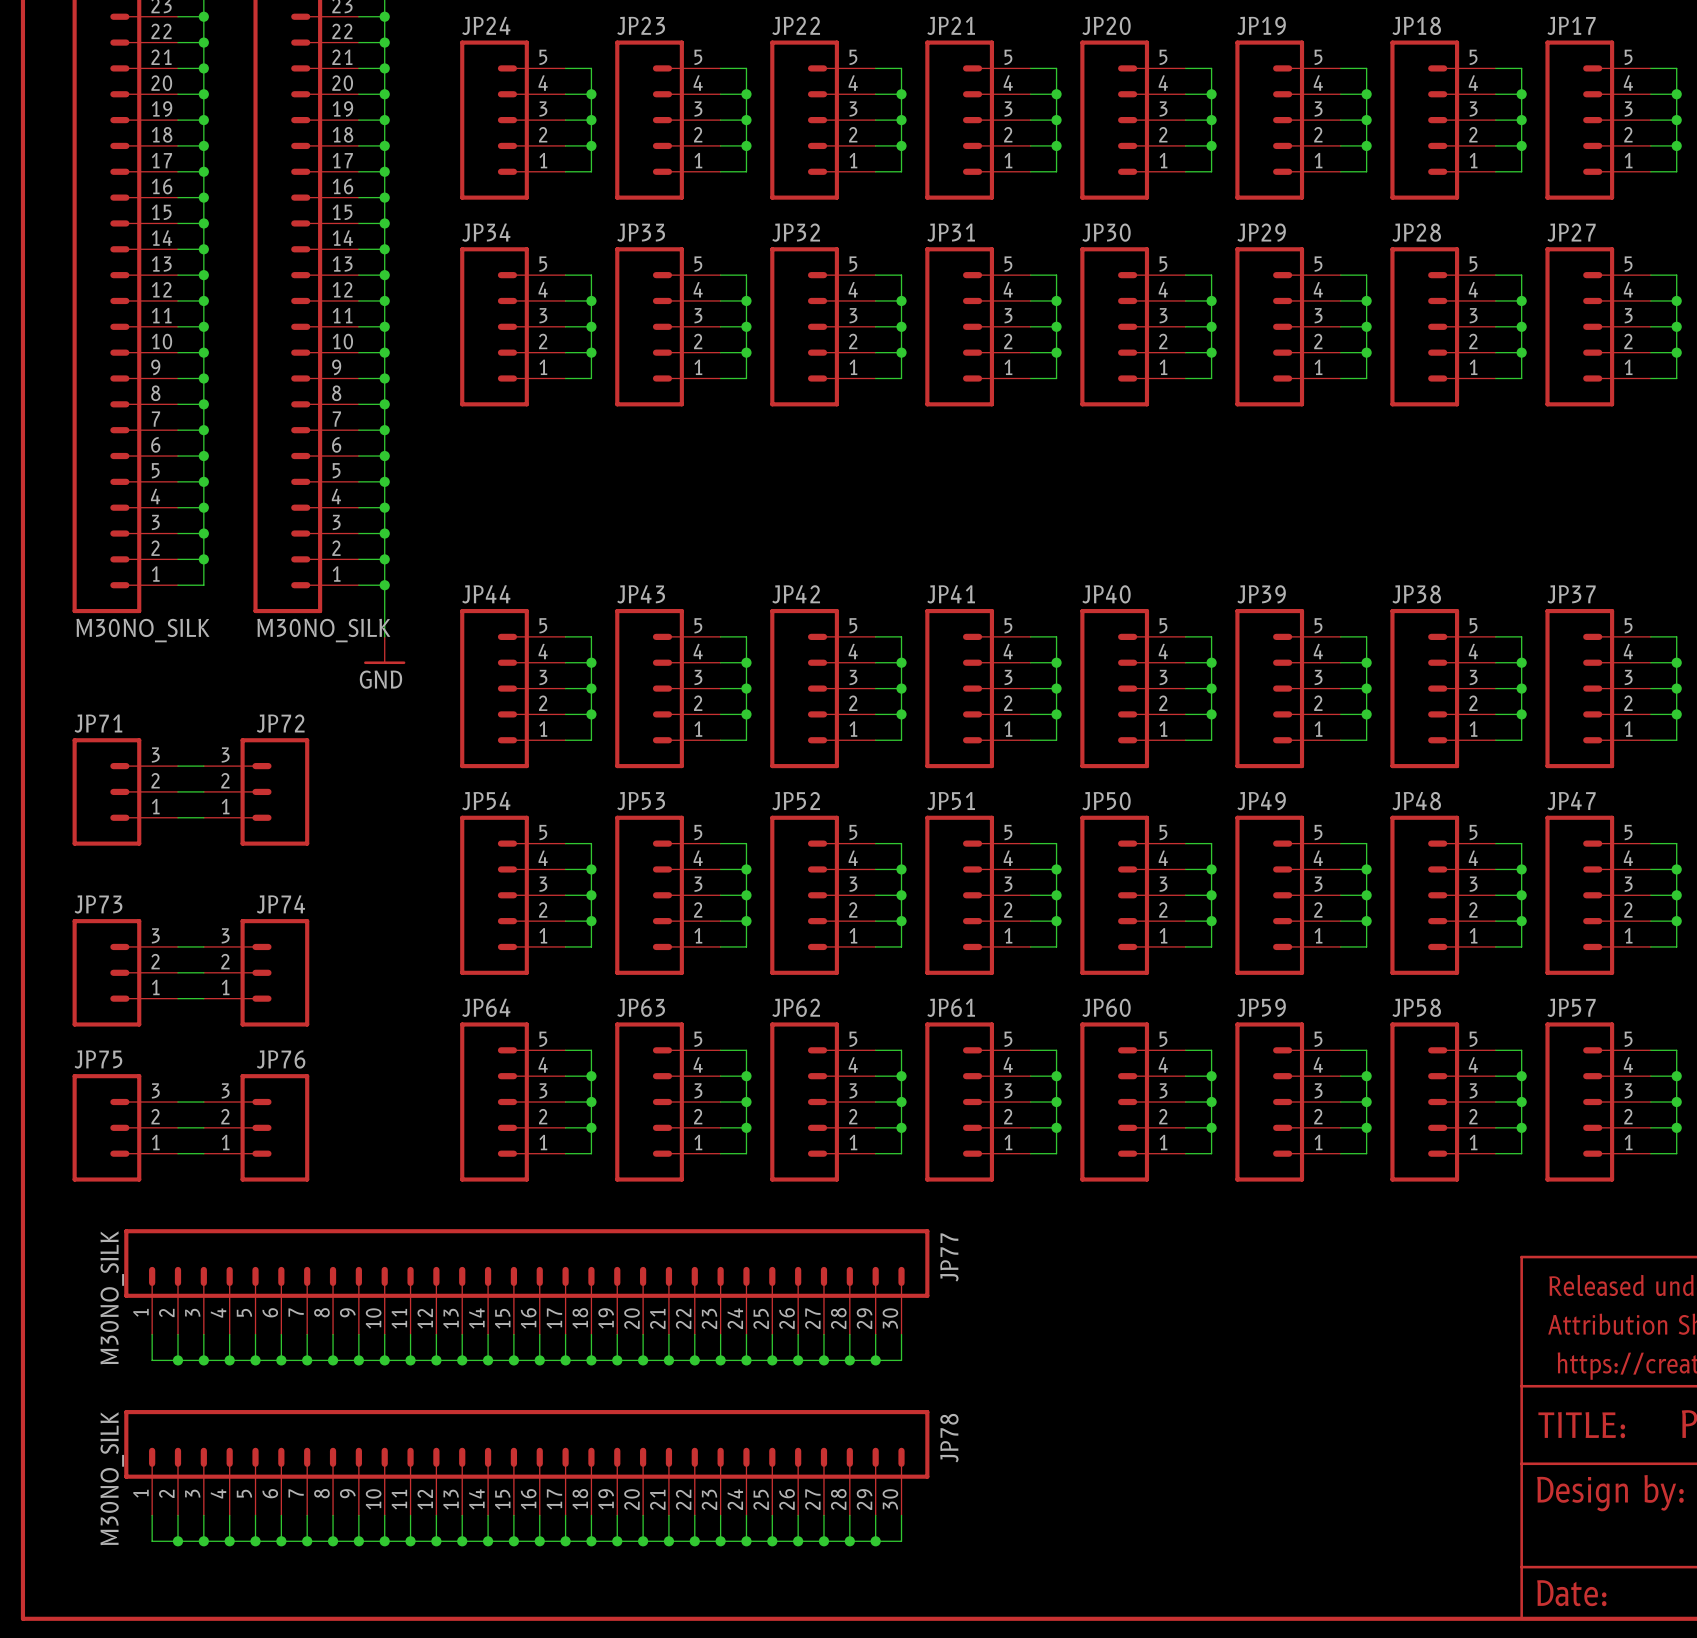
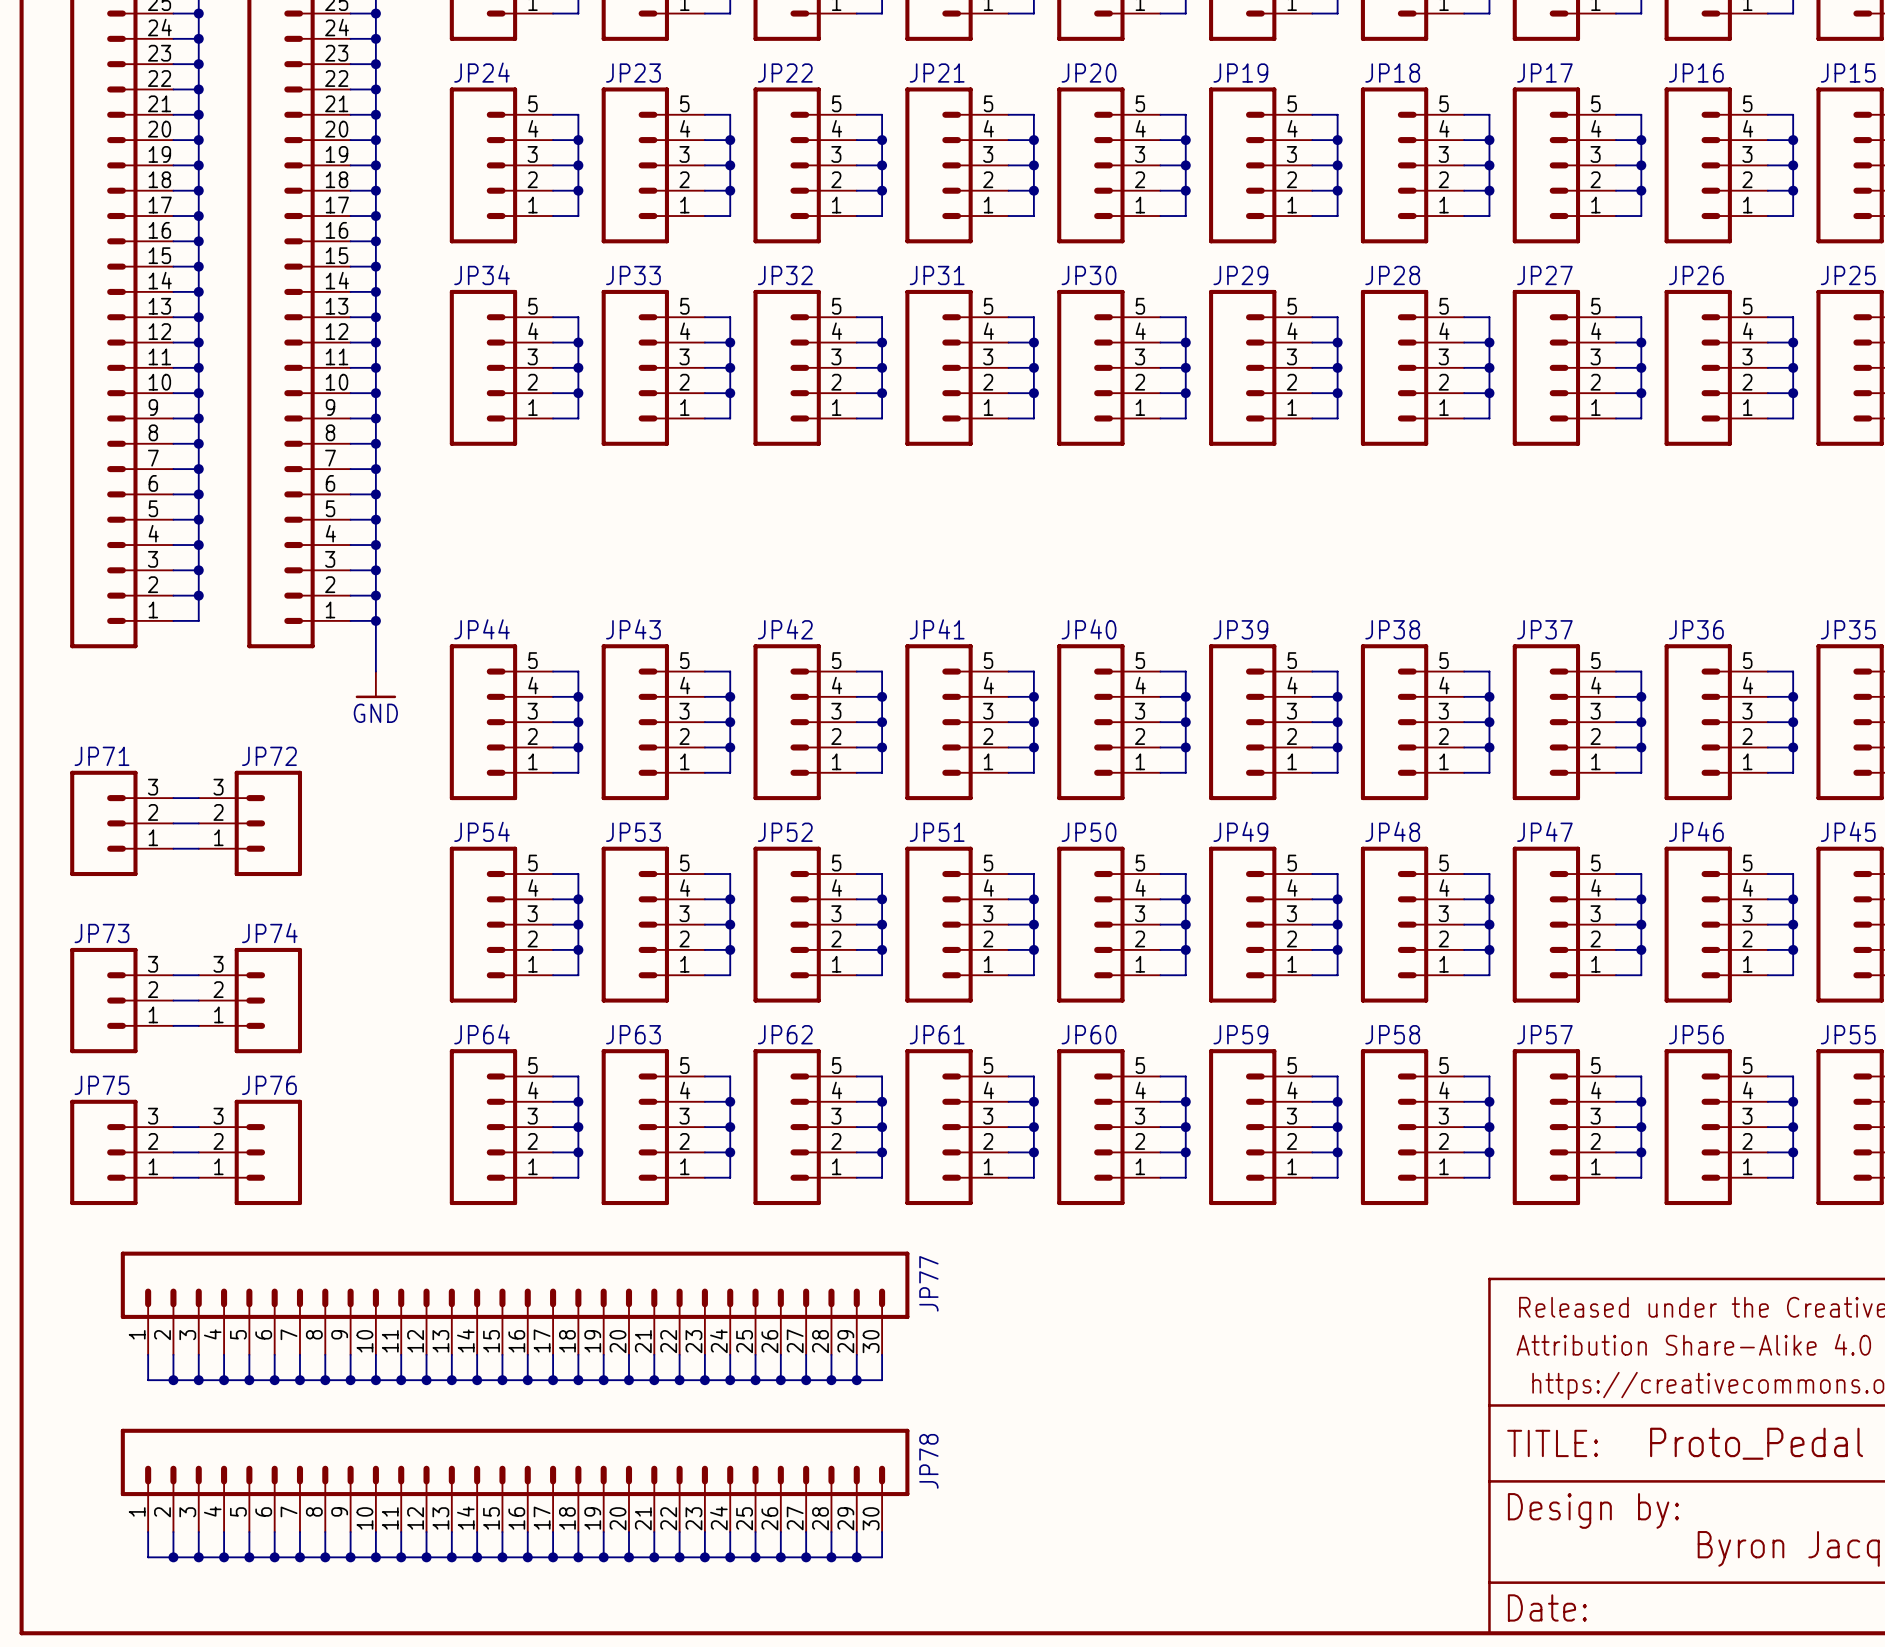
part value: M30NO_SILK (142, 630) -> none
part value: M30NO_SILK (323, 630) -> none
JP77 value: M30NO_SILK (112, 1297) -> none
JP78 value: M30NO_SILK (112, 1478) -> none

